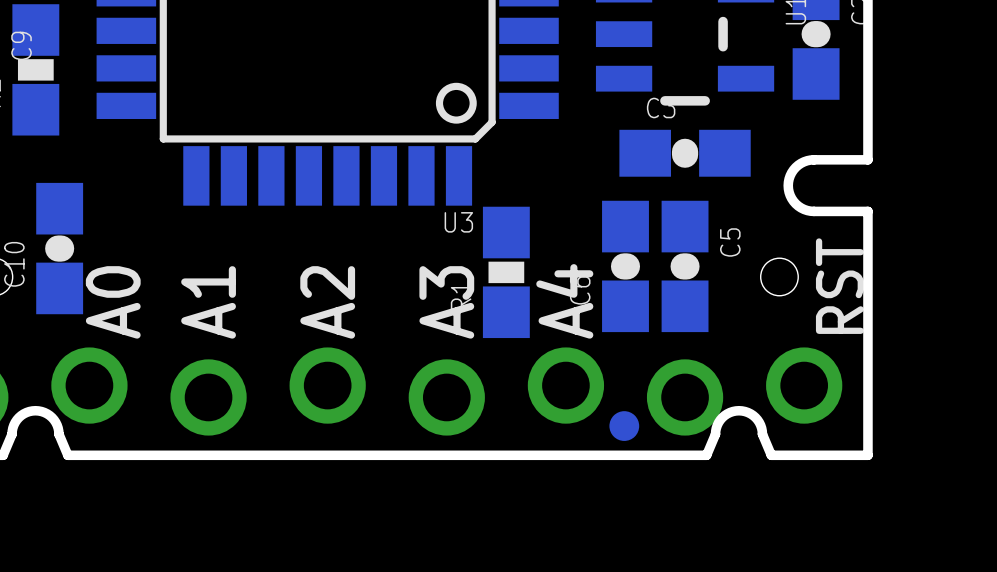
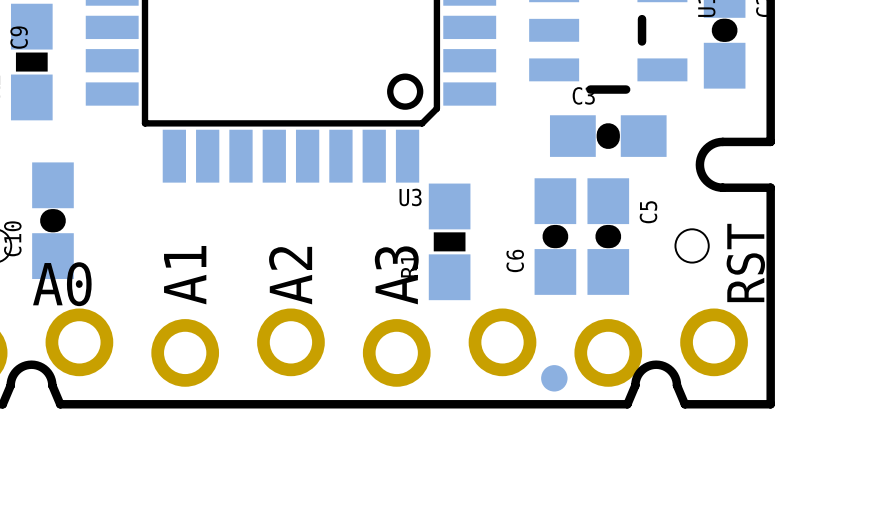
text: A4 (564, 301) -> none
text rotation: 0° (113, 302) -> 90° clockwise (62, 284)

